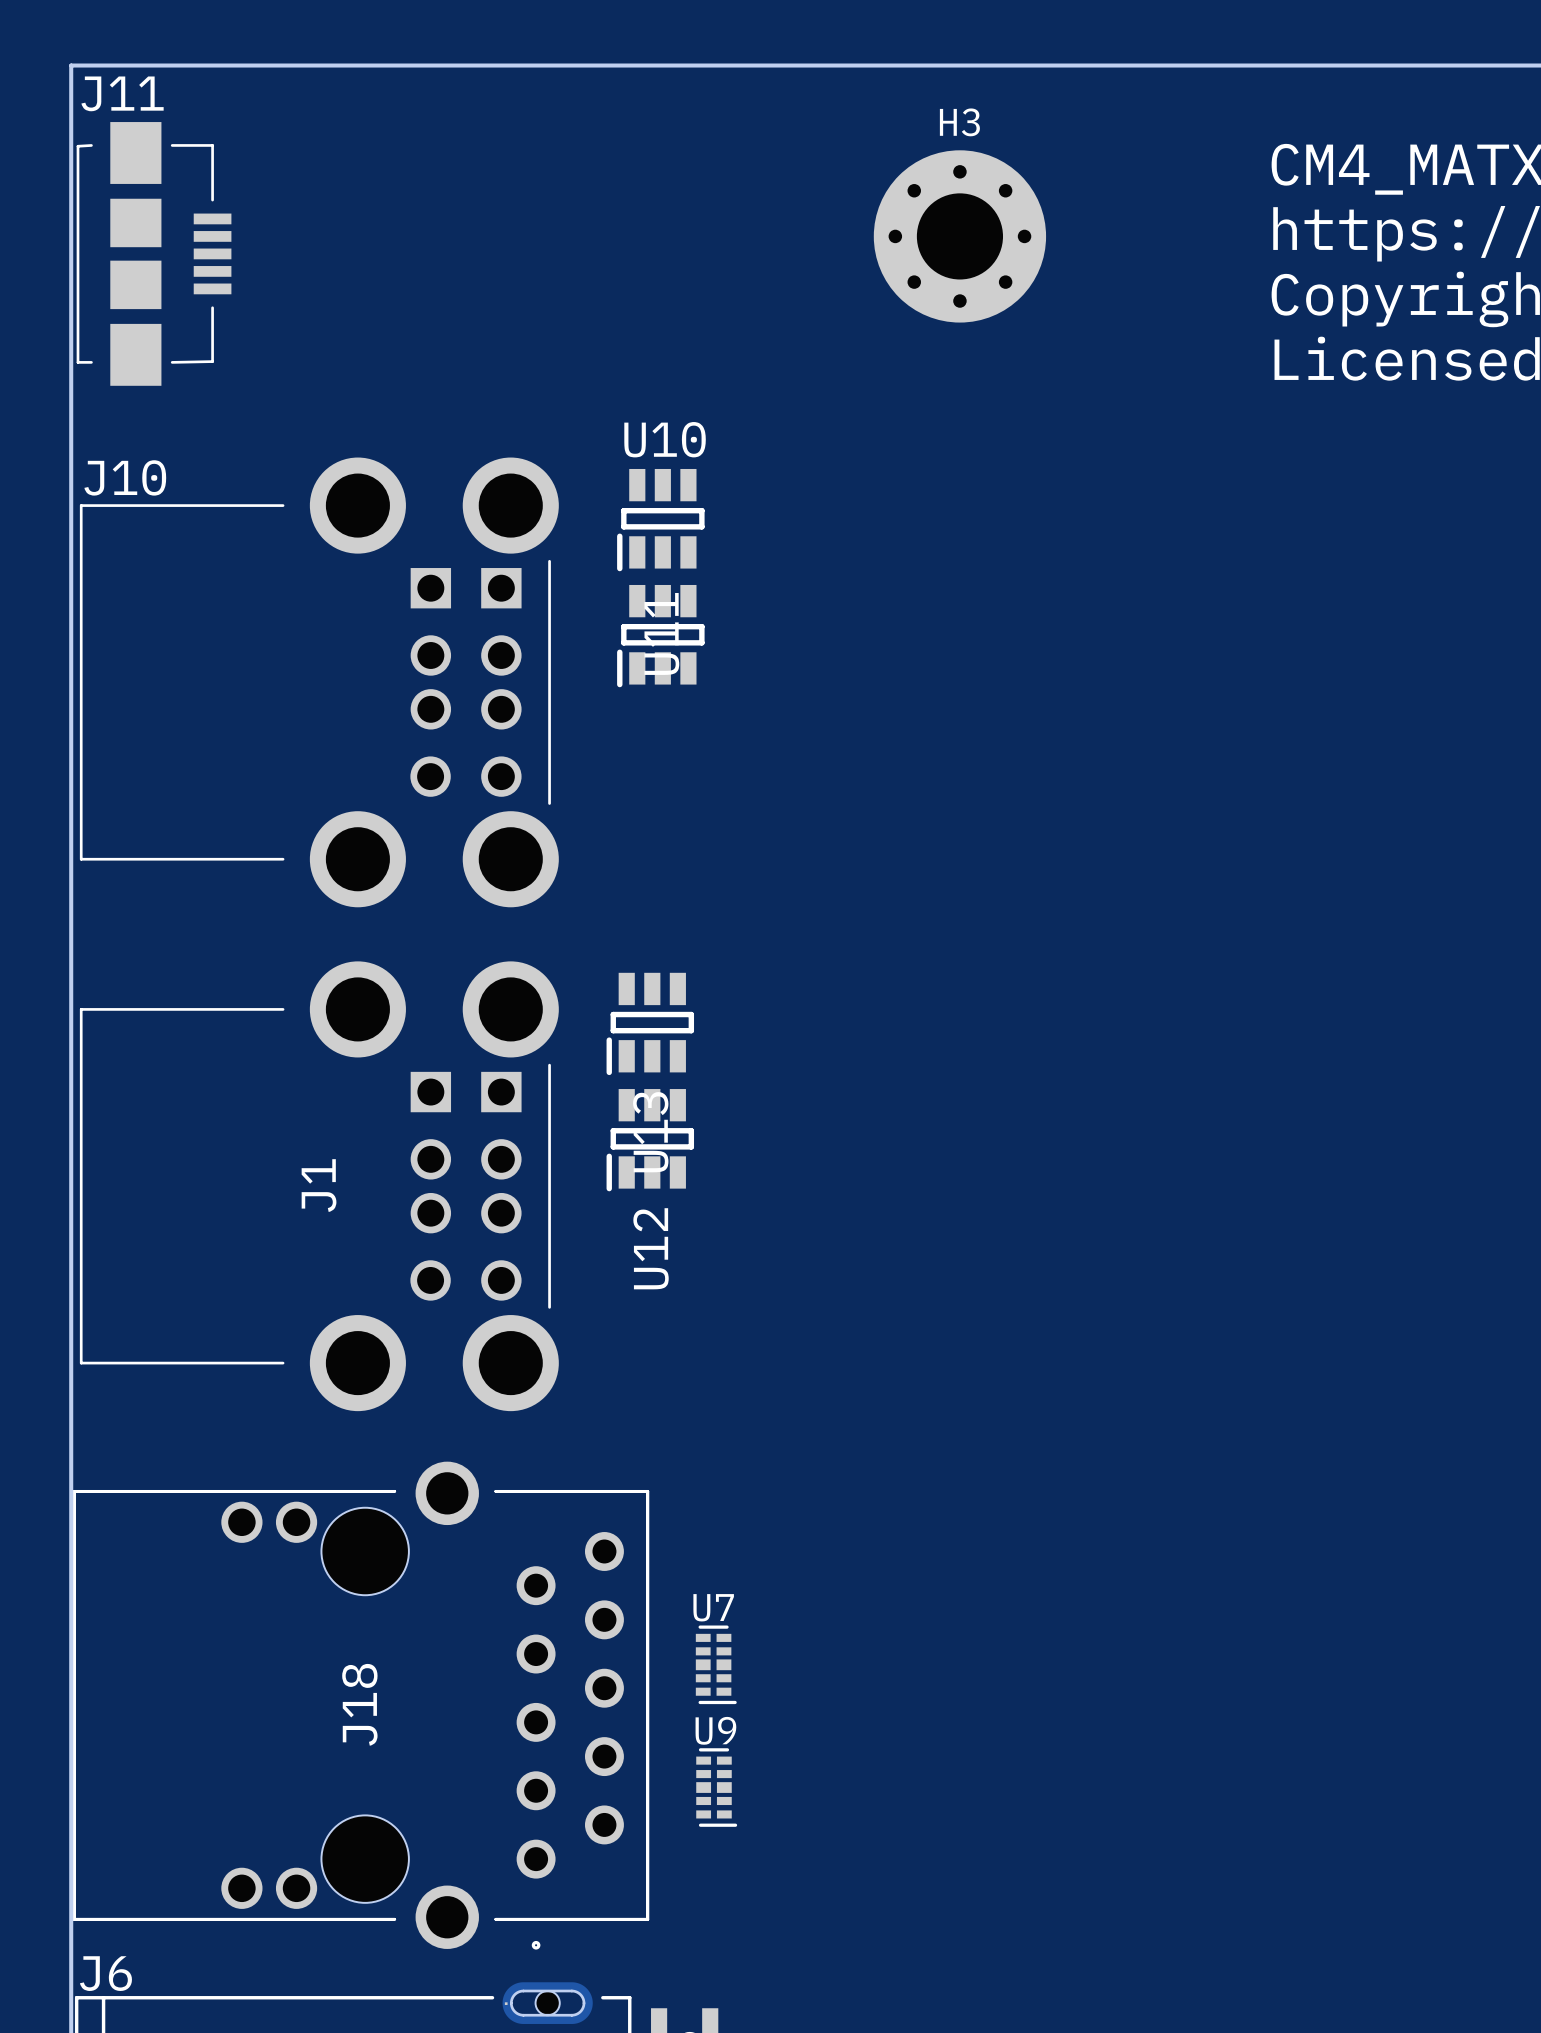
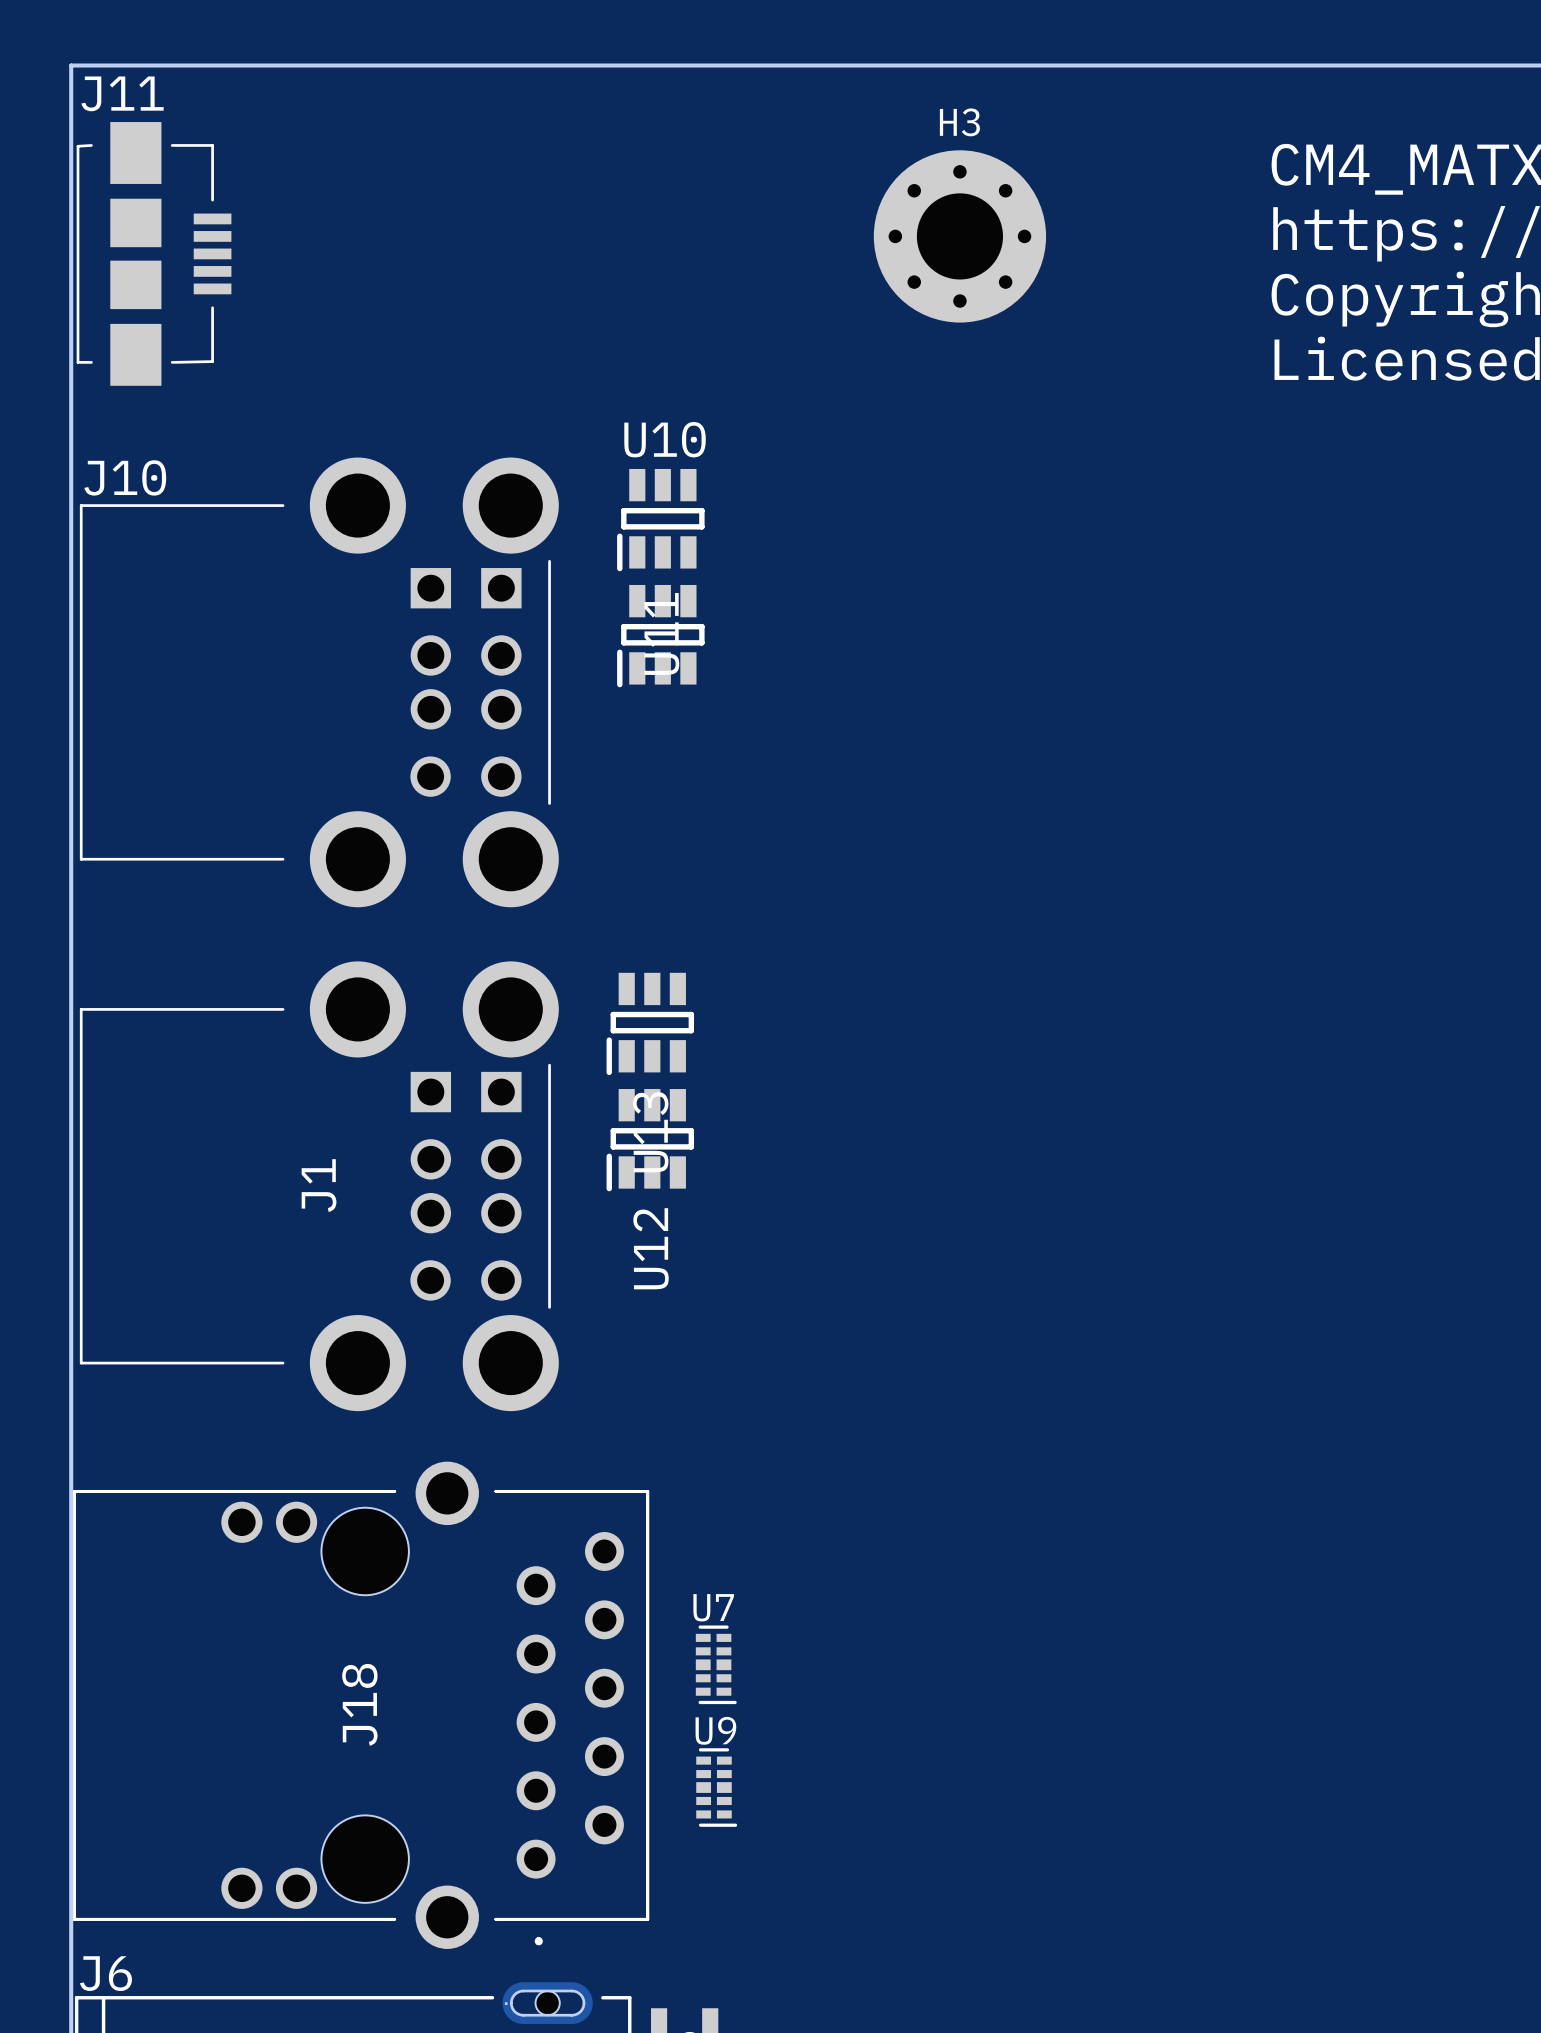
J18 footprint: [73, 1461, 650, 1950] -> [73, 1461, 650, 1949]

